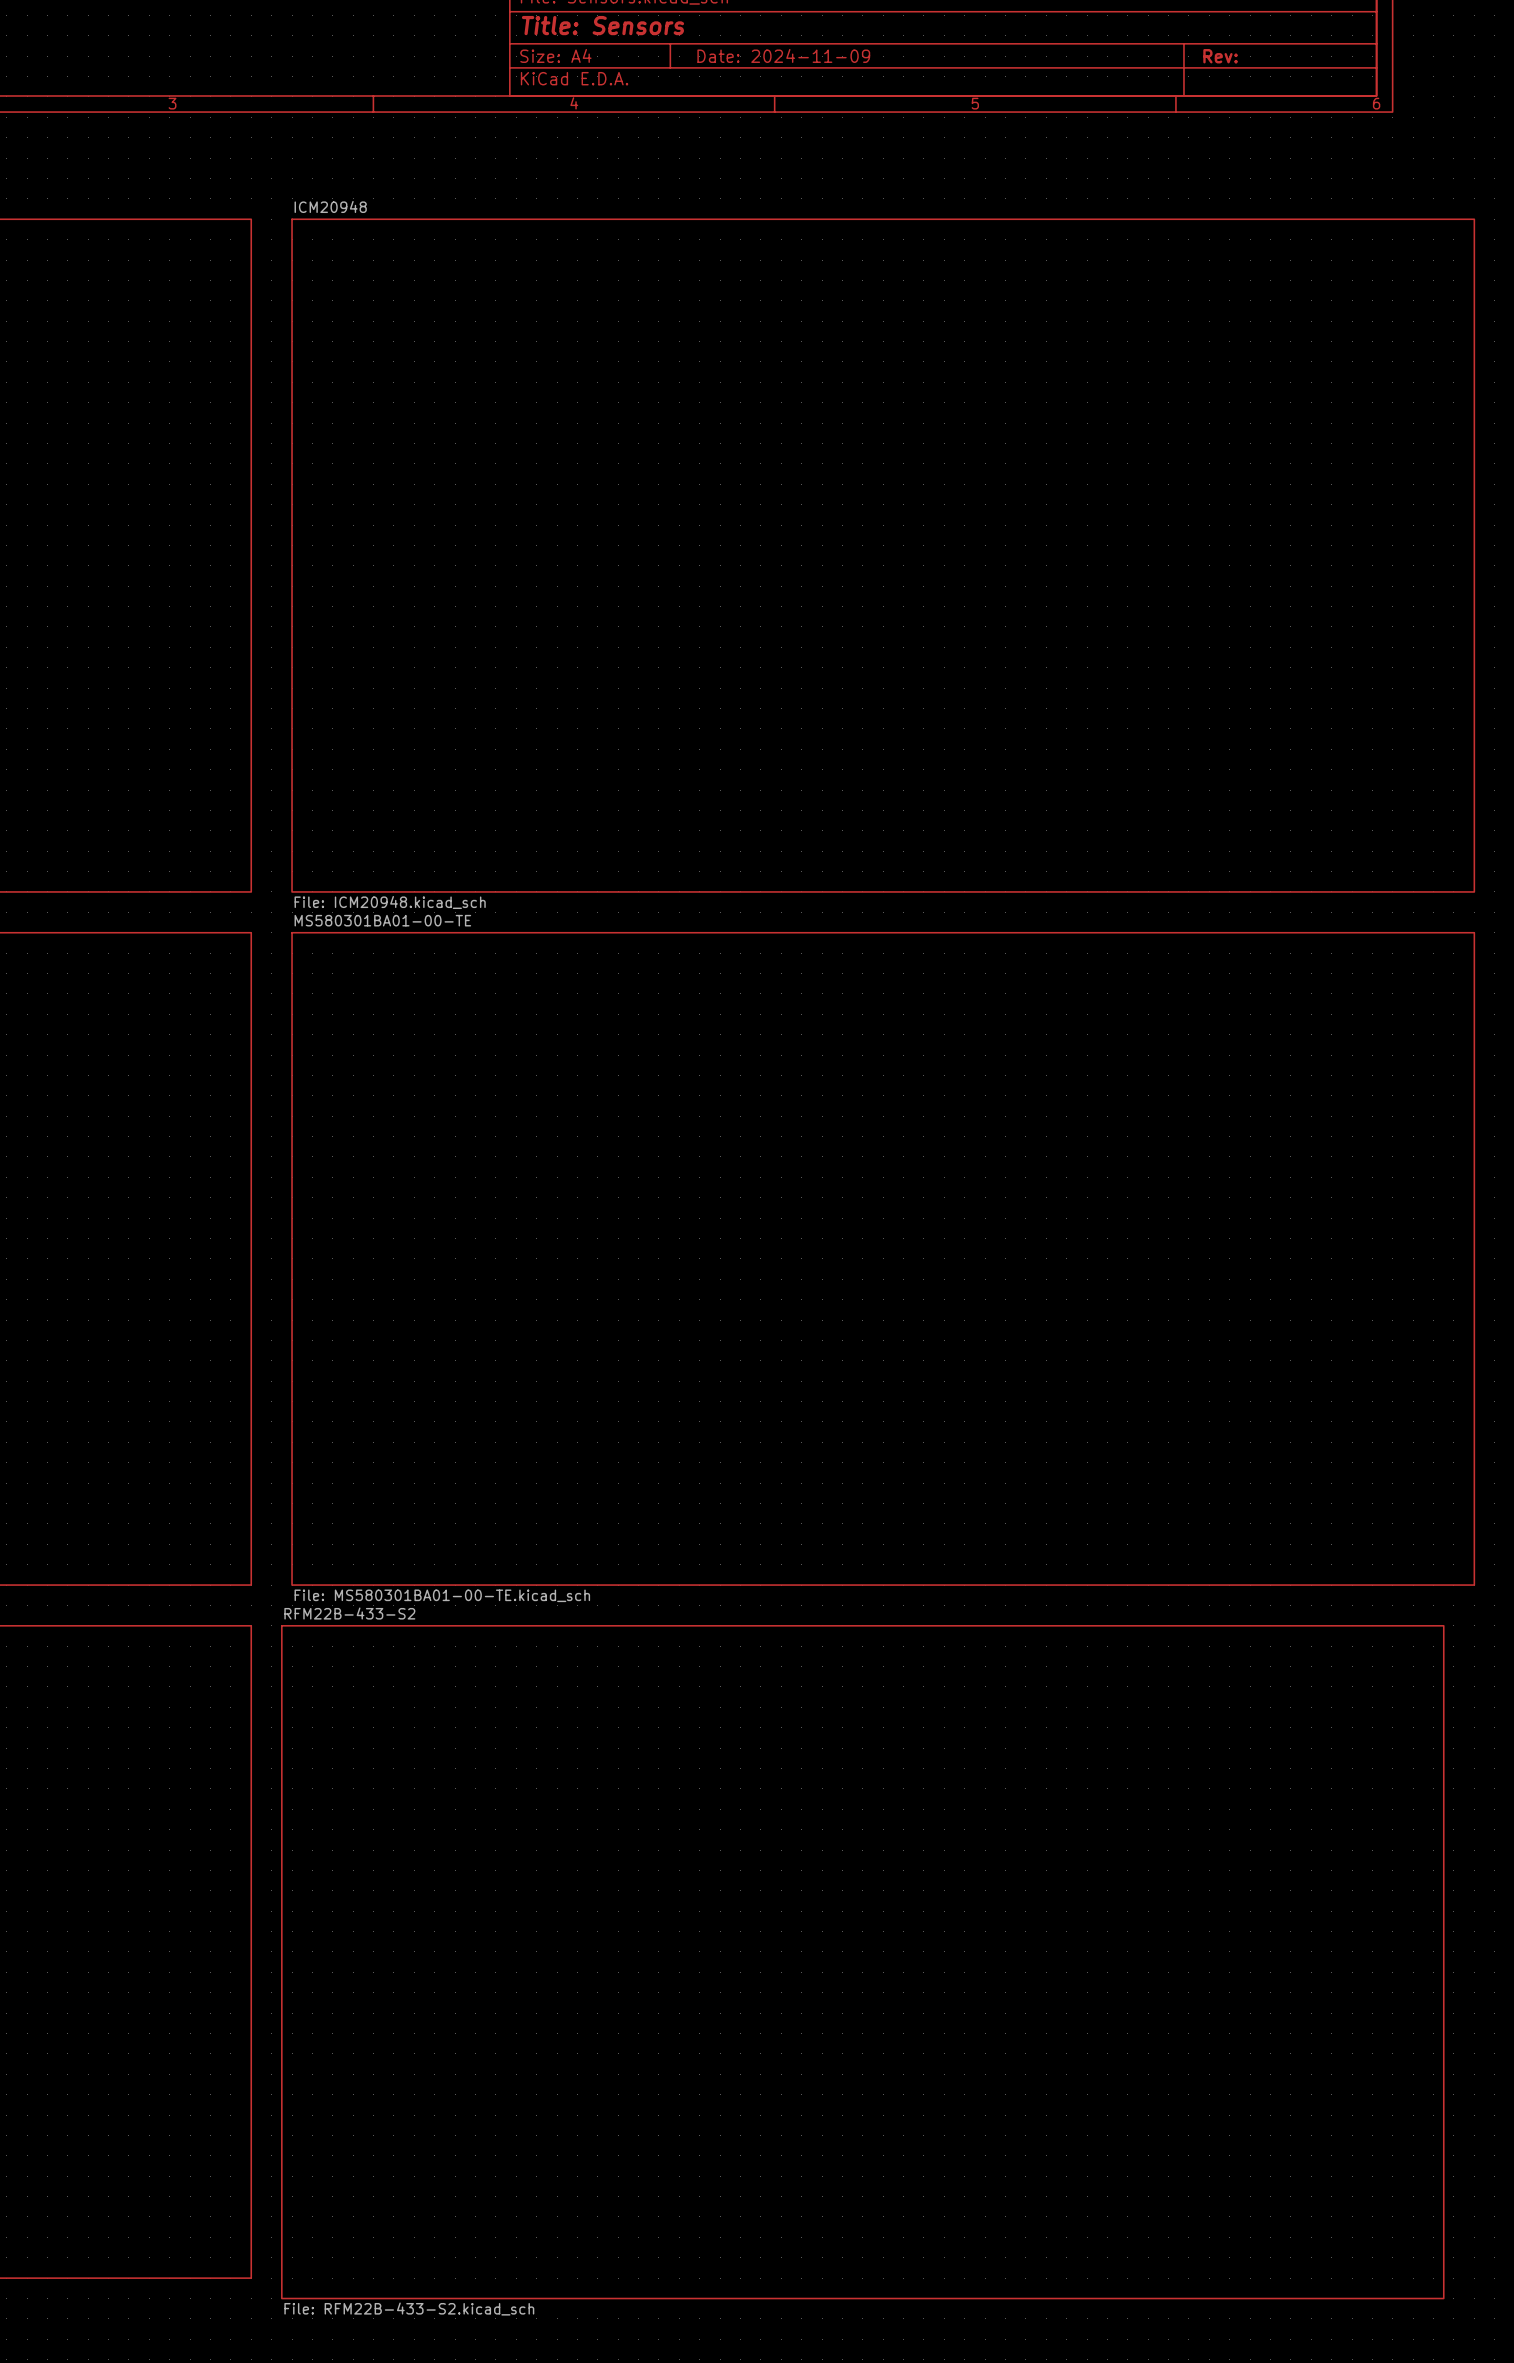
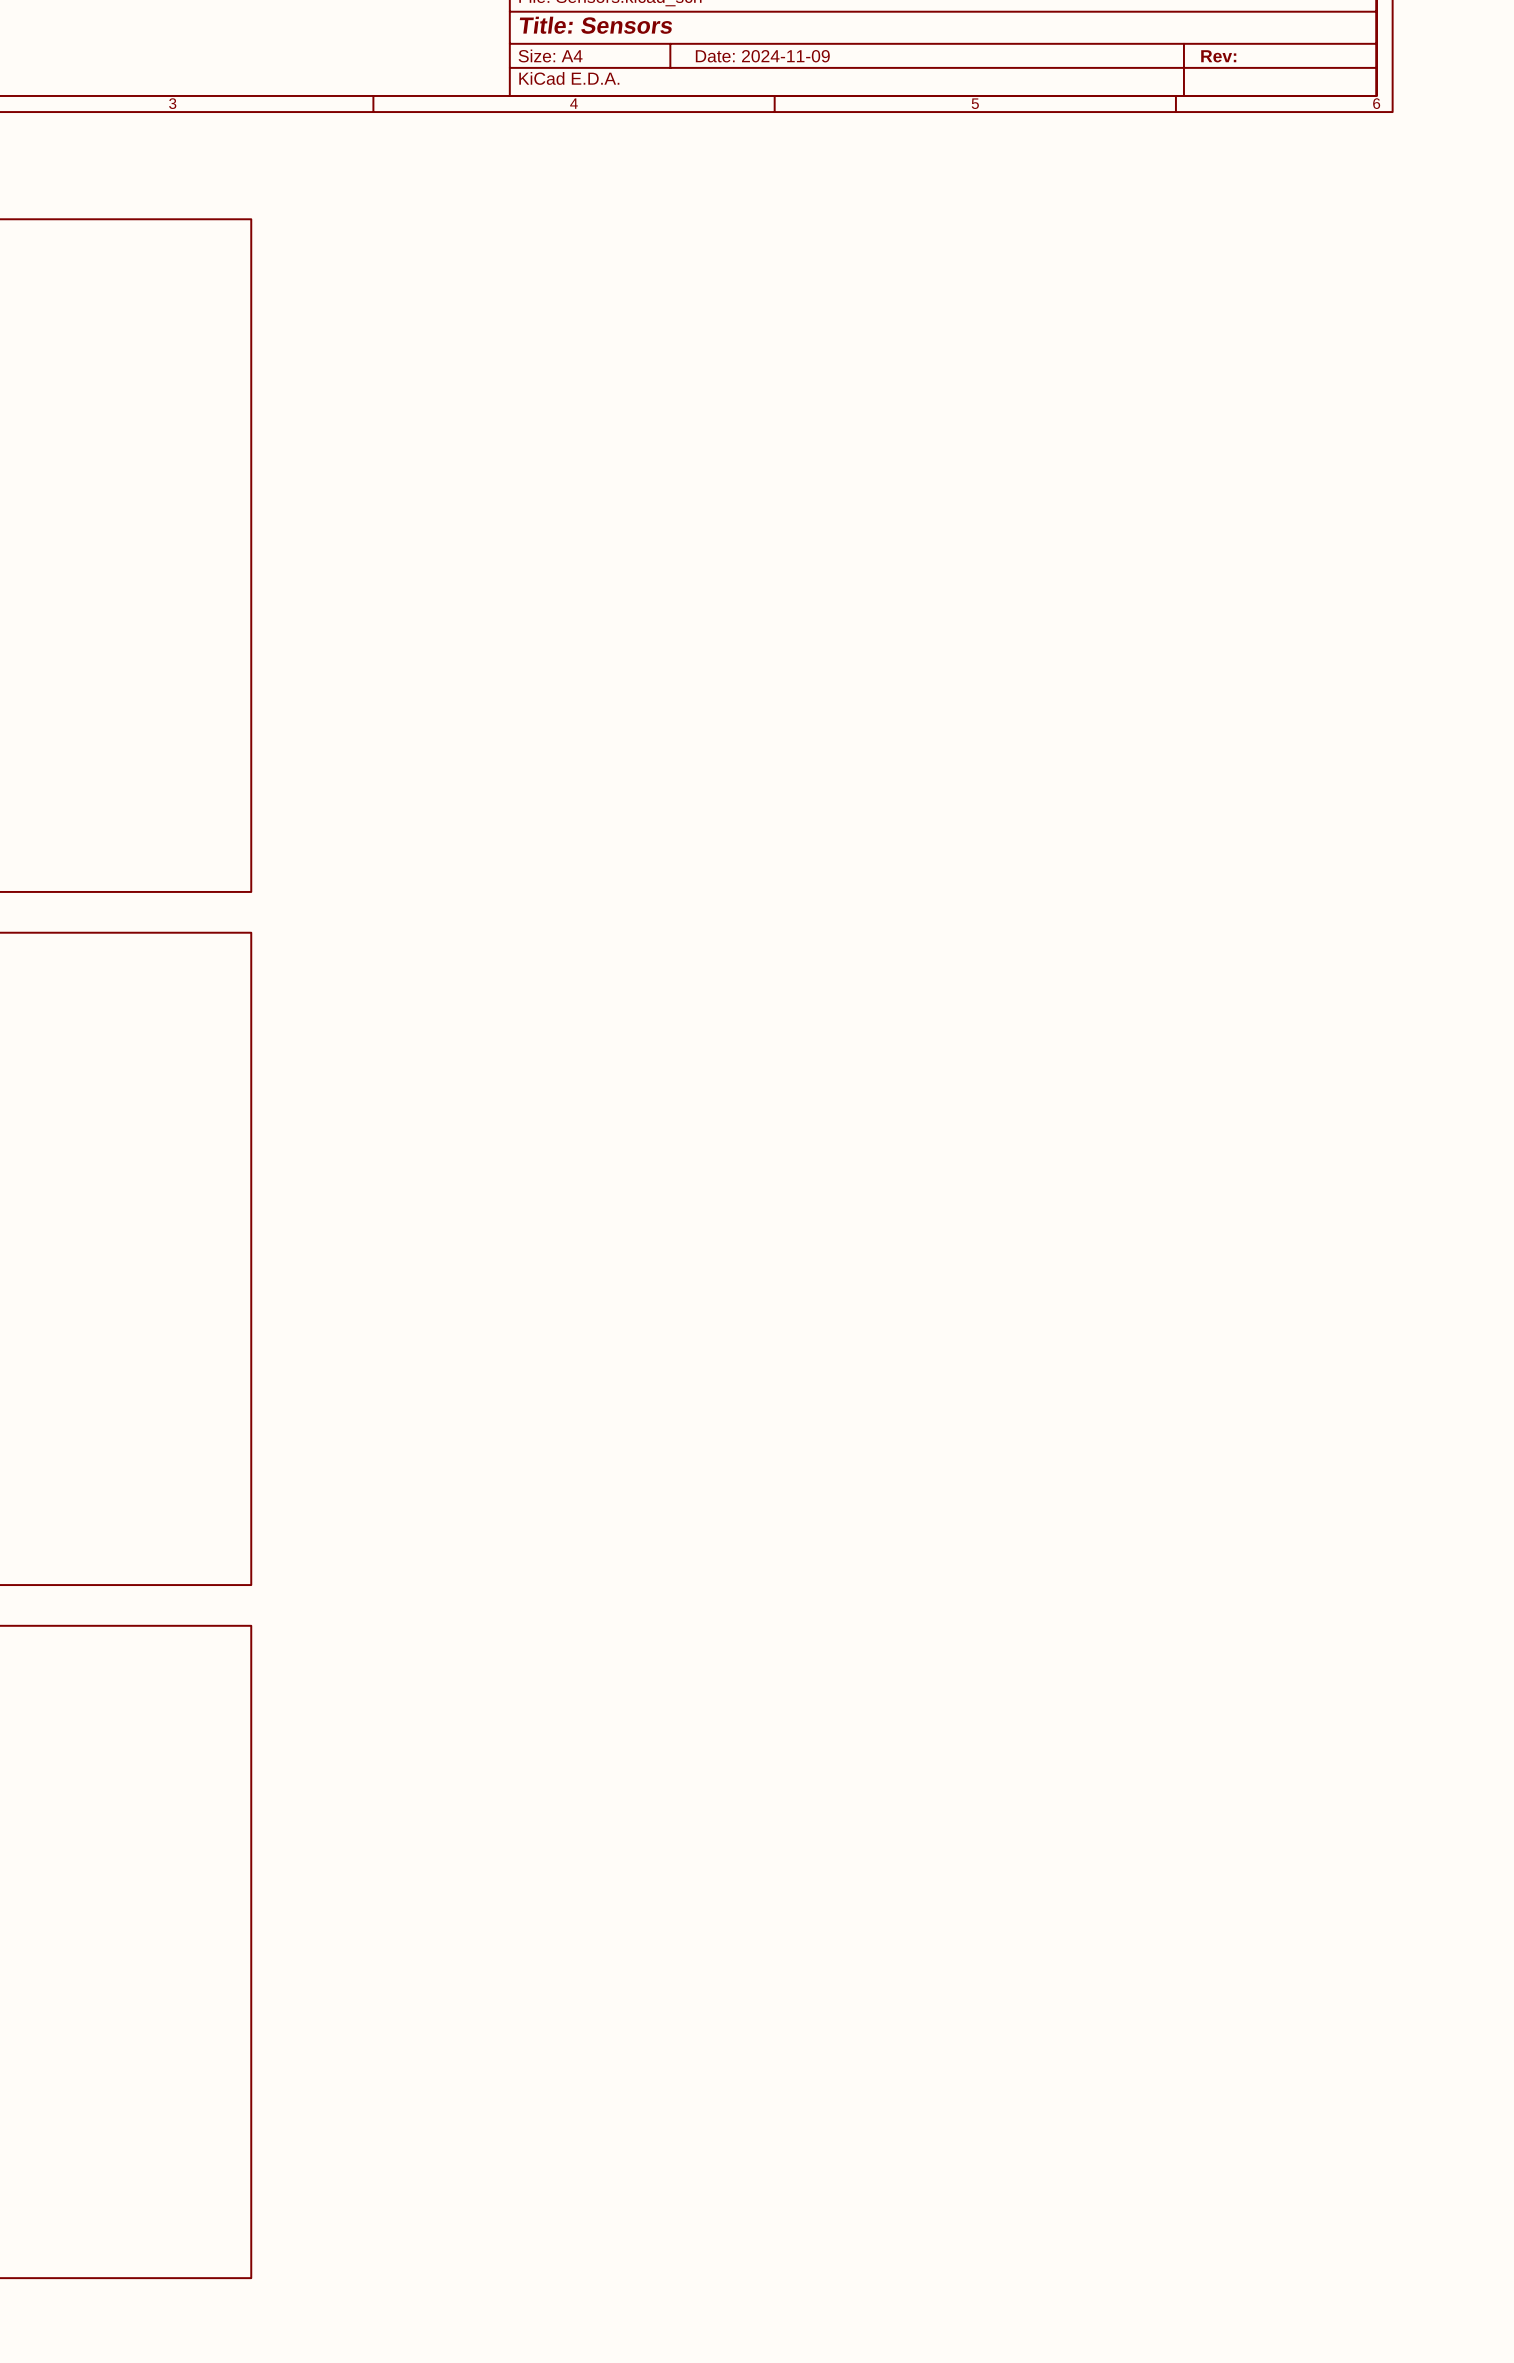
sheet ICM20948: File: ICM20948.kicad_sch (883, 555) -> none
sheet MS580301BA01-00-TE: File: MS580301BA01-00-TE.kicad_sch (883, 1258) -> none
sheet RFM22B-433-S2: File: RFM22B-433-S2.kicad_sch (862, 1962) -> none

